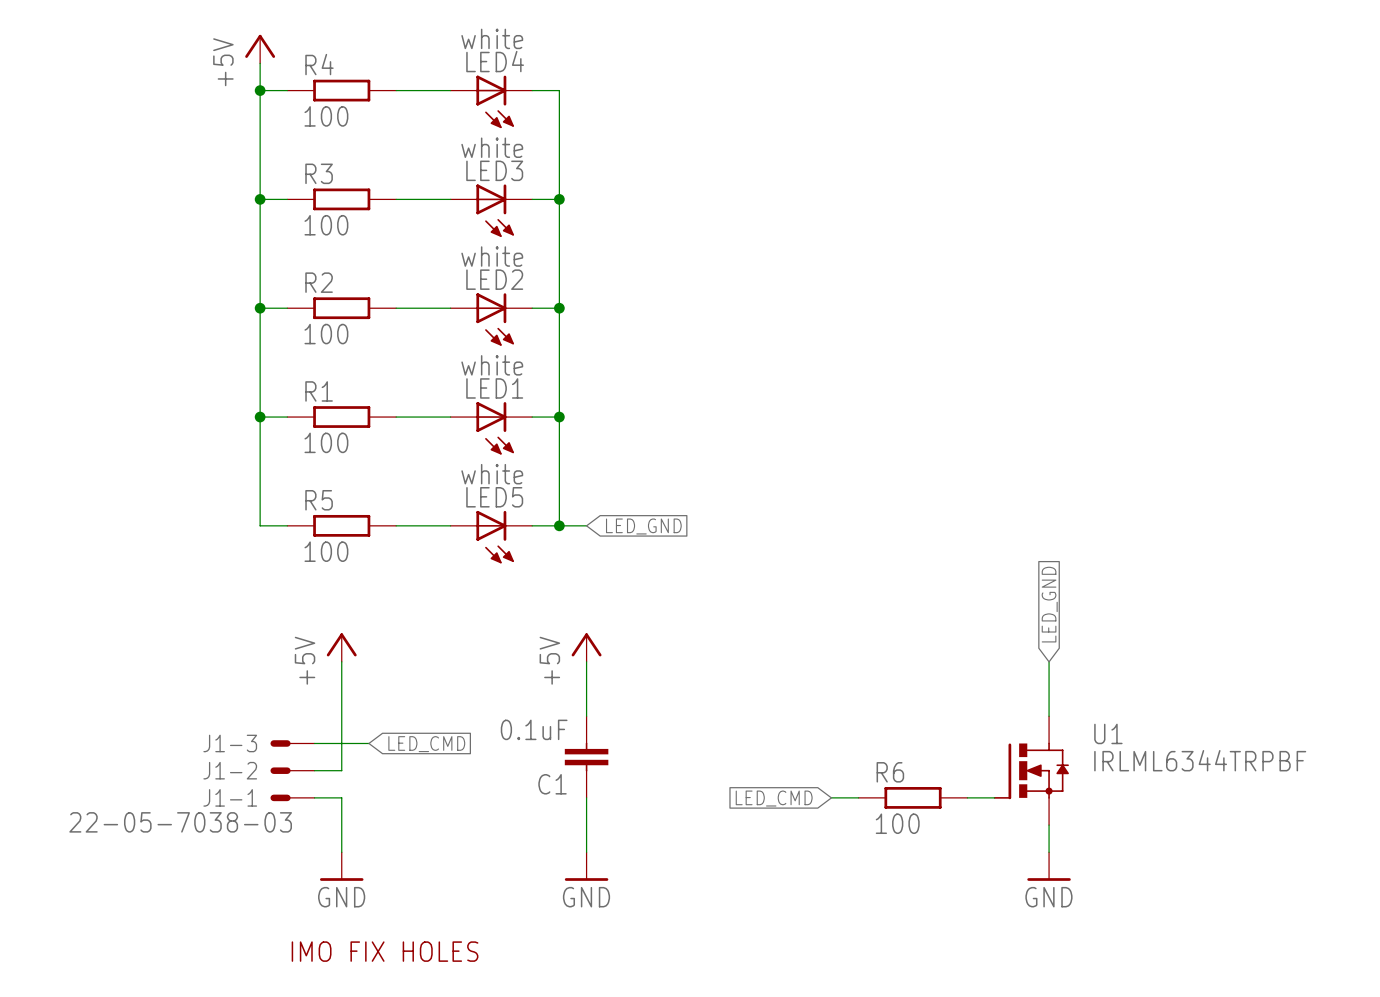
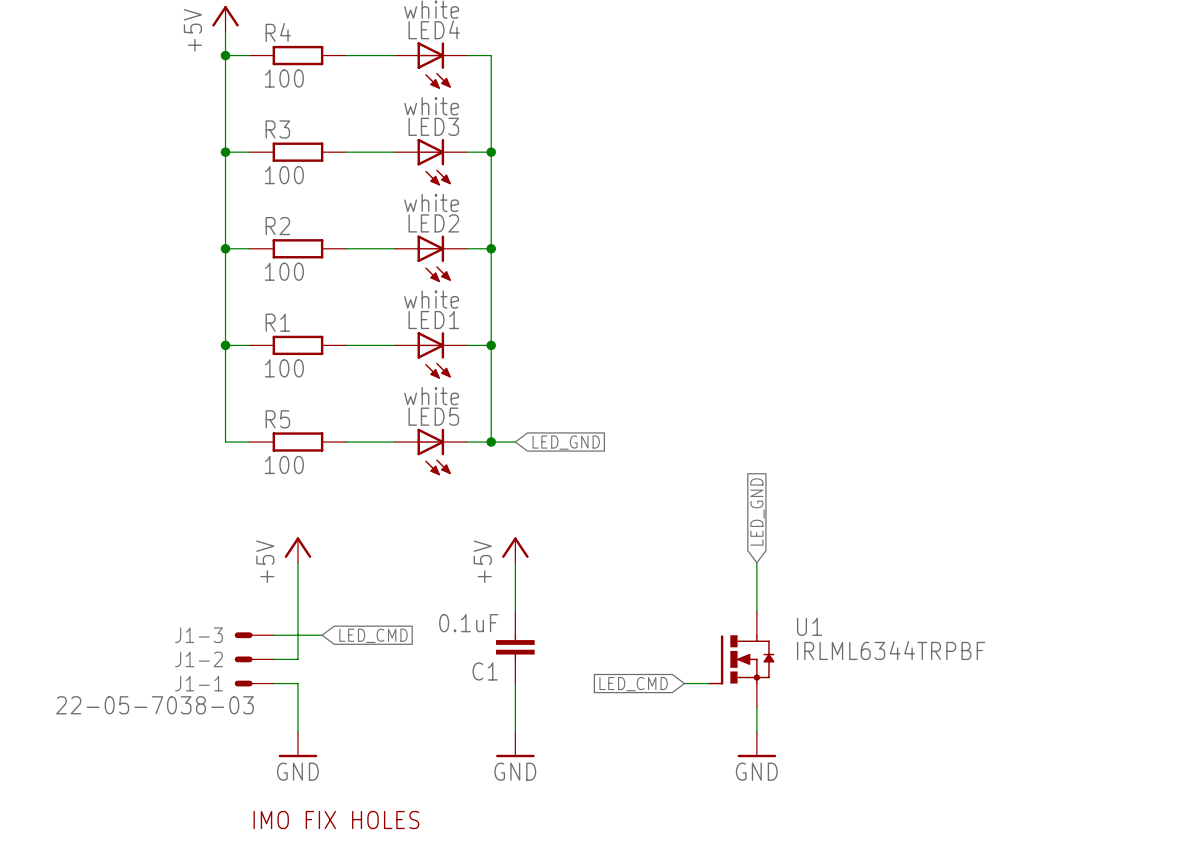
global label position: LED_GND (1049, 604) -> LED_GND (757, 511)
wire: (1049, 661) (1049, 716) -> (756, 562) (756, 611)
U1 position: (1031, 770) -> (741, 659)
wire: (831, 797) (858, 797) -> (684, 683) (708, 683)
R6: 100 (913, 797) -> none
wire: (967, 797) (994, 797) -> none
global label position: LED_CMD (774, 798) -> LED_CMD (633, 684)
wire: (1049, 825) (1049, 852) -> (756, 707) (756, 731)
power symbol position: GND (1049, 866) -> GND (756, 744)

